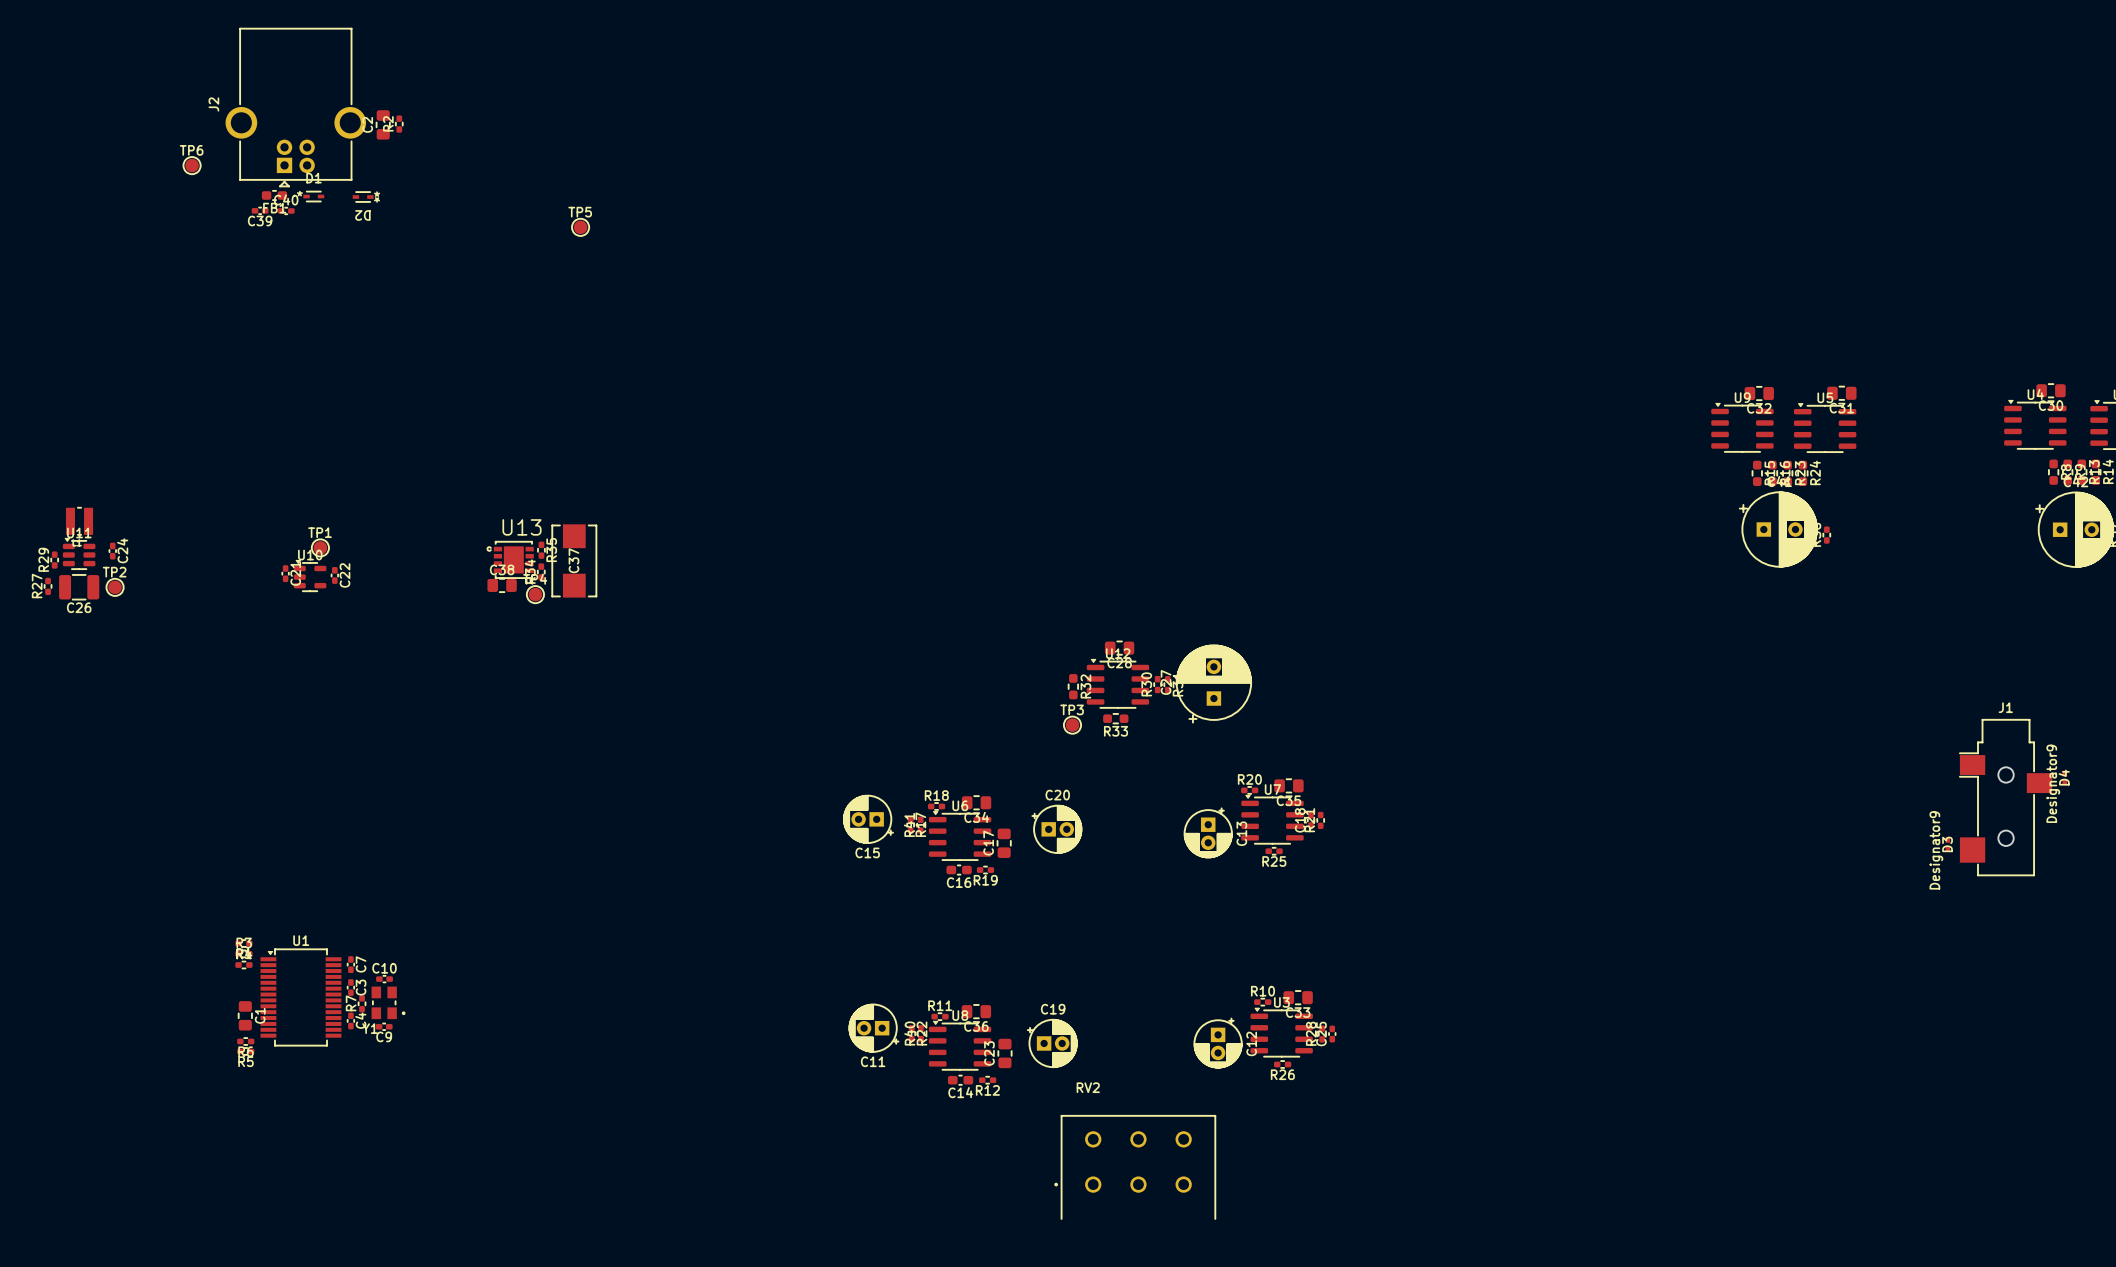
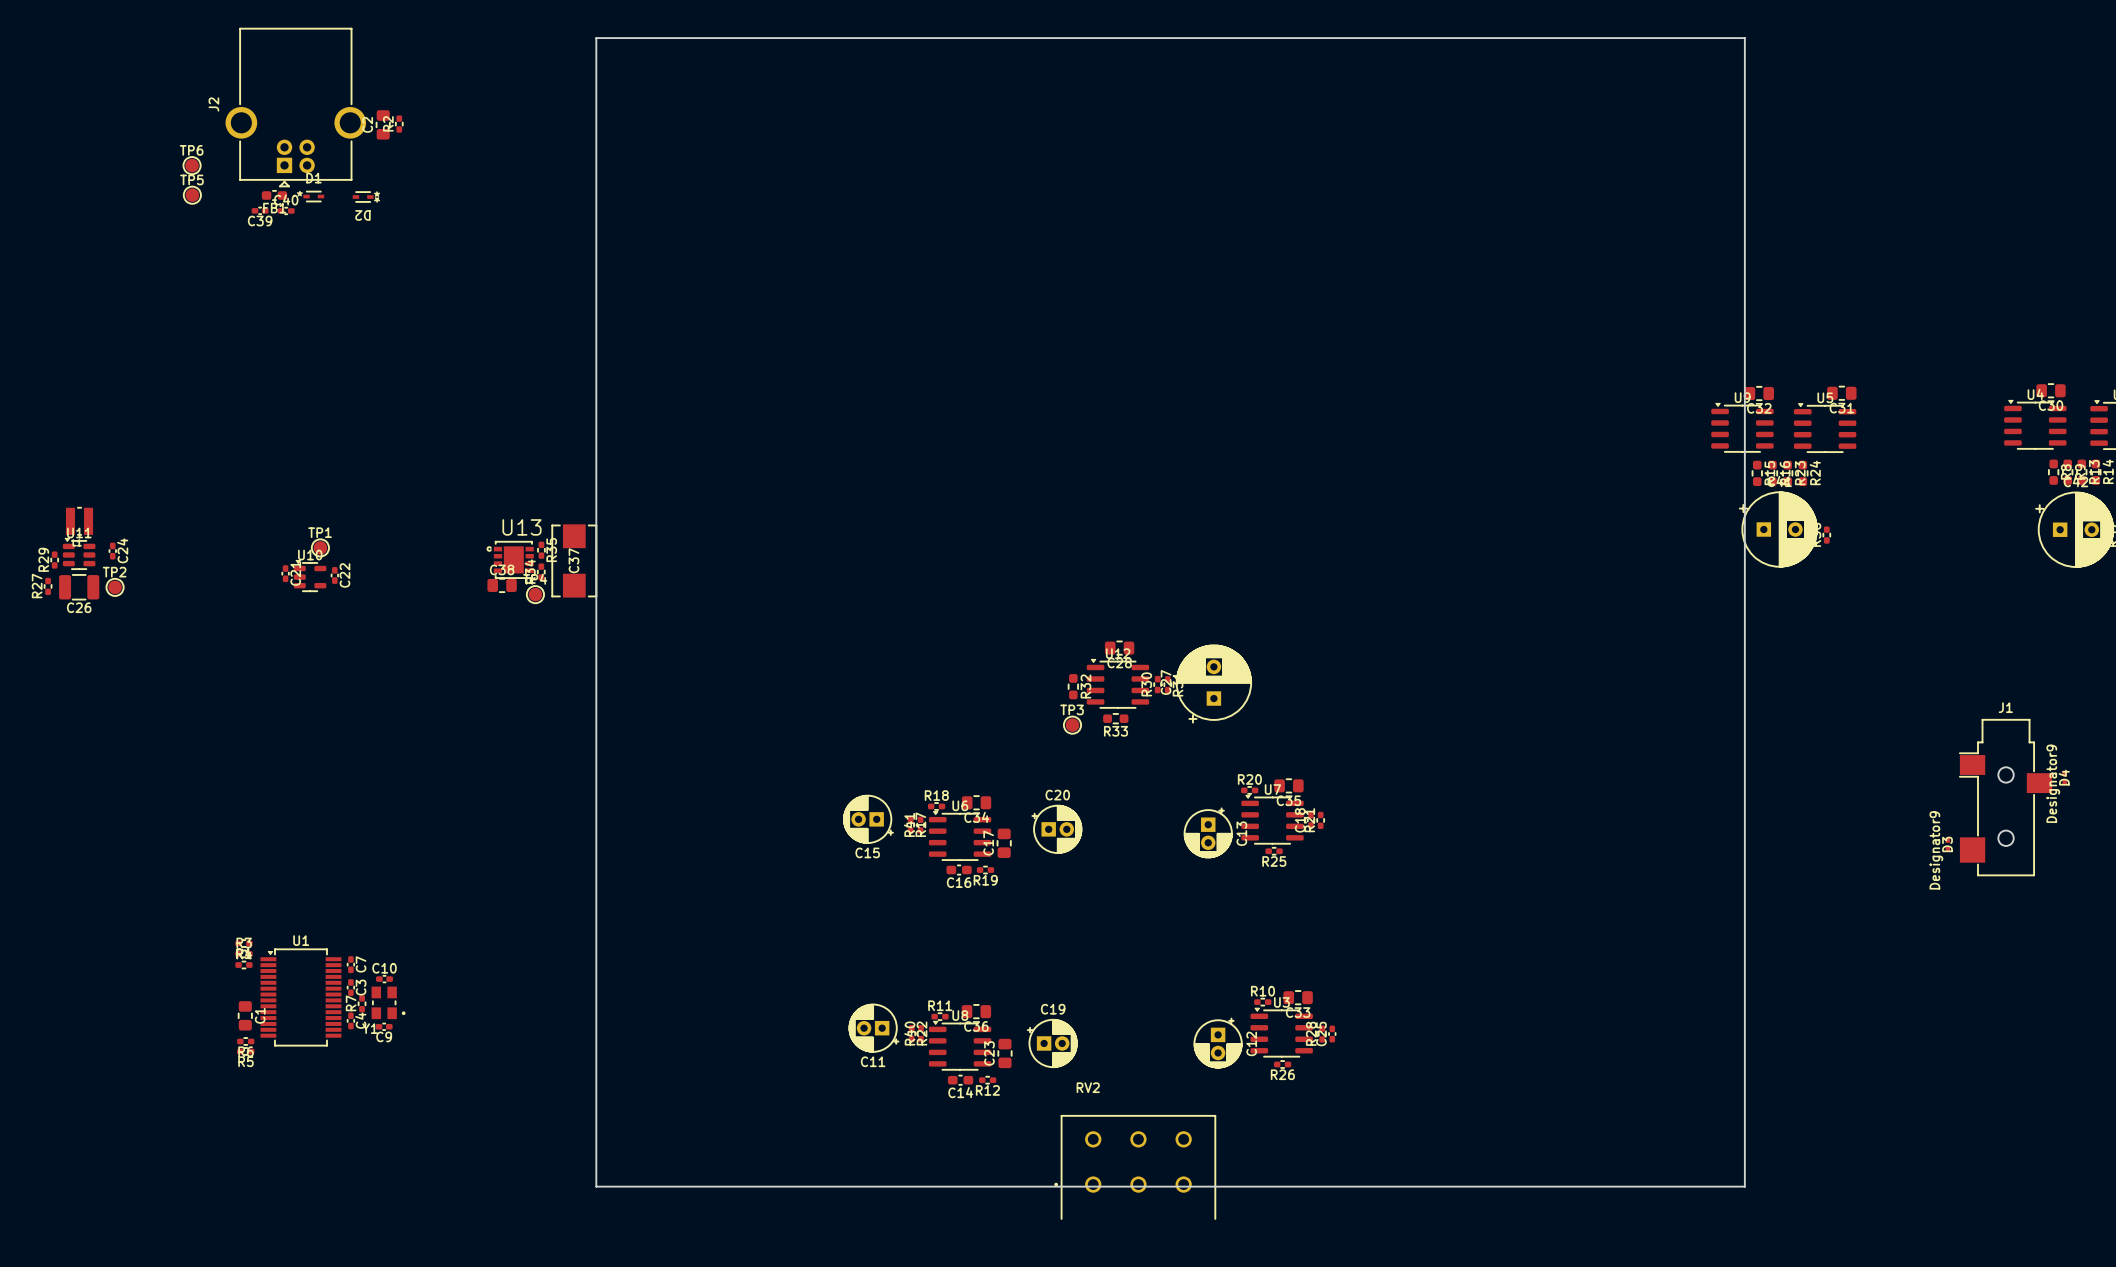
board edge: none -> (596, 38) (1744, 38) (1744, 1186) (596, 1186) (596, 38)
TP5 position: (580, 227) -> (192, 195)

